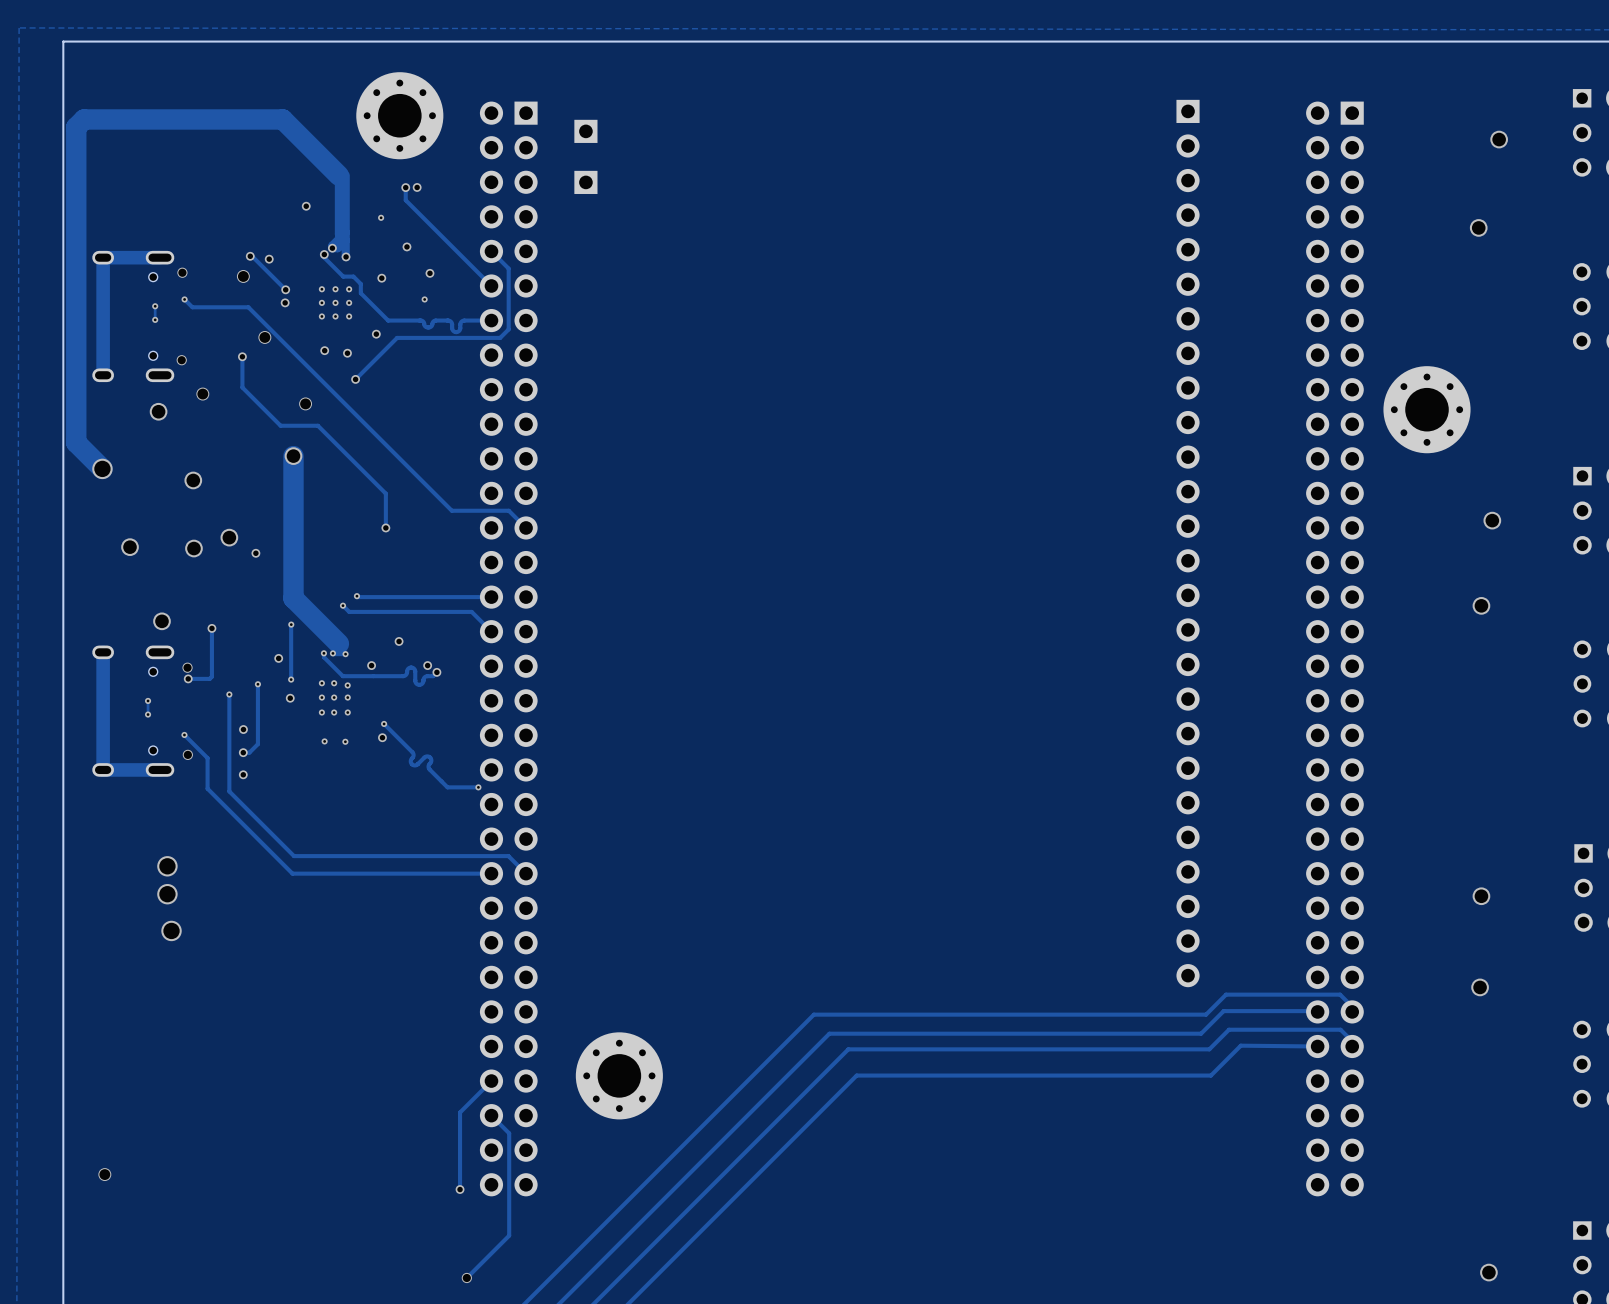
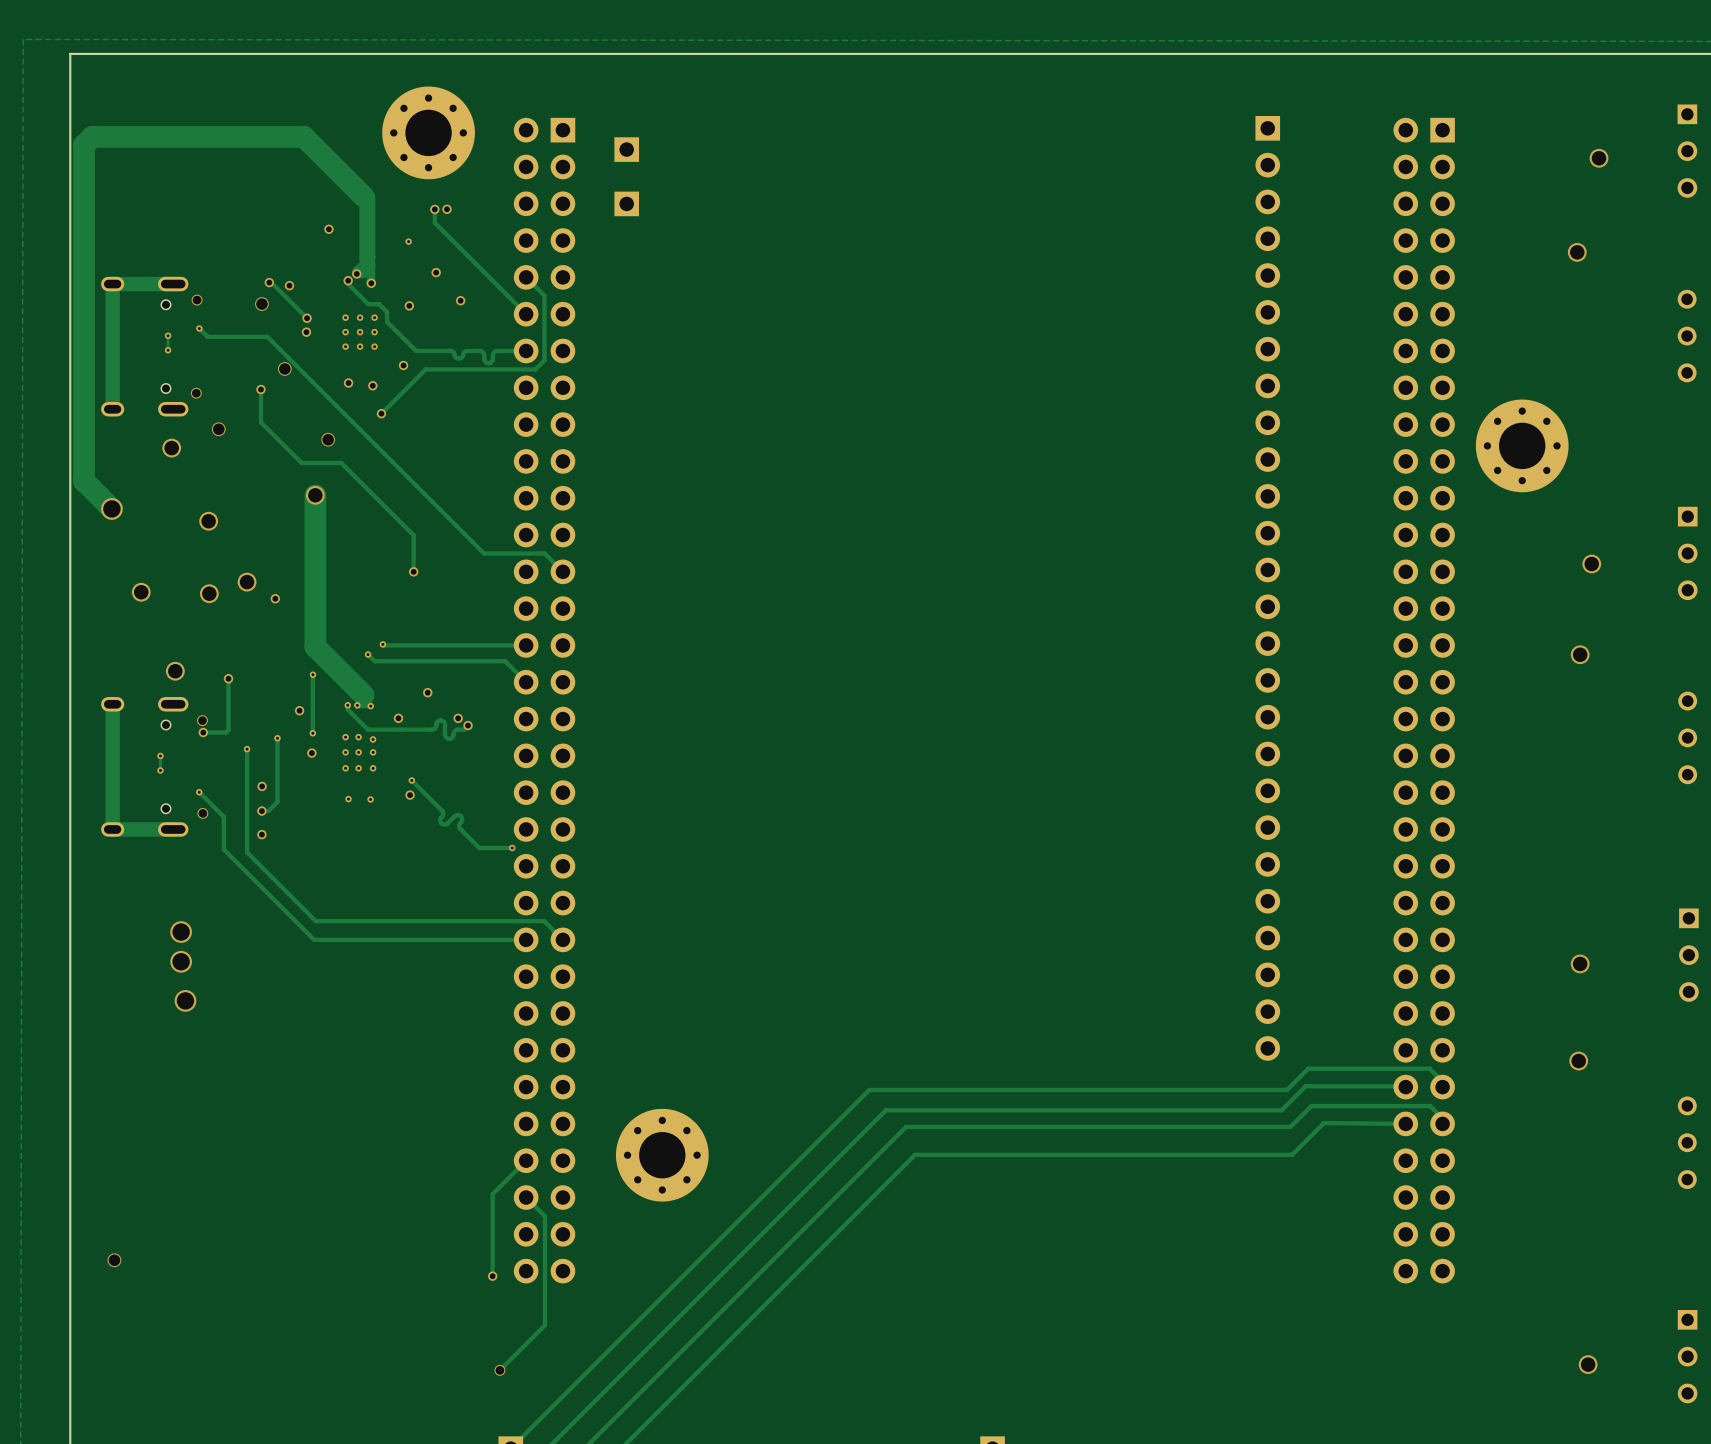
via: (424, 299) -> none

